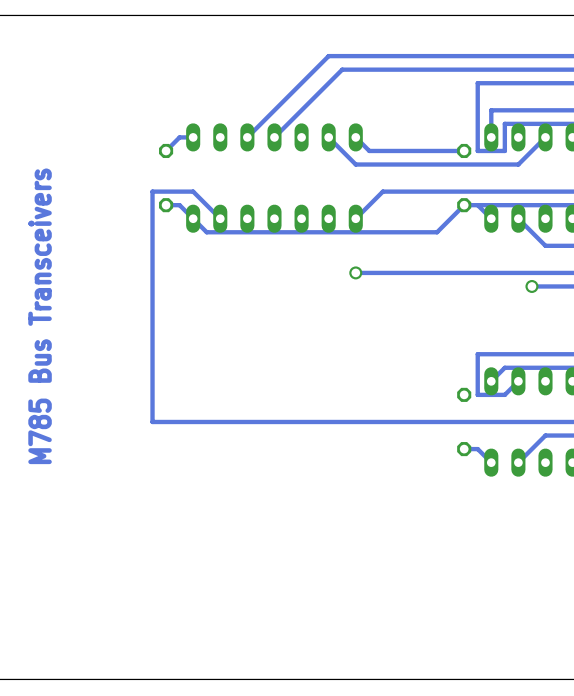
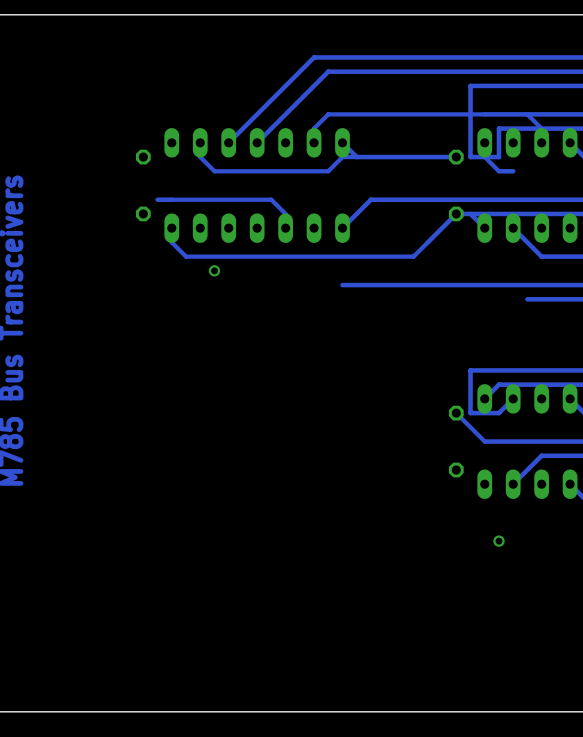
track: (491, 110) (491, 137) -> (498, 171) (484, 157) (484, 142)
track: (193, 137) (179, 137) (166, 150) -> none
track: none -> (200, 142) (200, 157) (214, 171) (328, 171) (342, 157) (356, 157)
track: (328, 137) (355, 164) (504, 164) -> (314, 142) (314, 128) (328, 114) (484, 114)
track: (545, 137) (518, 164) -> (541, 142) (541, 128) (527, 114)
track: (179, 191) (152, 191) (152, 421) (491, 421) -> (456, 413) (484, 441)
track: (193, 191) (220, 218) -> (171, 199) (271, 199) (285, 213) (285, 228)
track: (166, 205) (179, 205) (206, 232) (437, 232) -> (171, 228) (171, 242) (186, 256) (413, 256) (427, 242)
via: none -> (214, 270)
via: (355, 272) -> none
via: (531, 286) -> none
track: (464, 449) (477, 449) (491, 462) -> none
via: none -> (498, 541)

